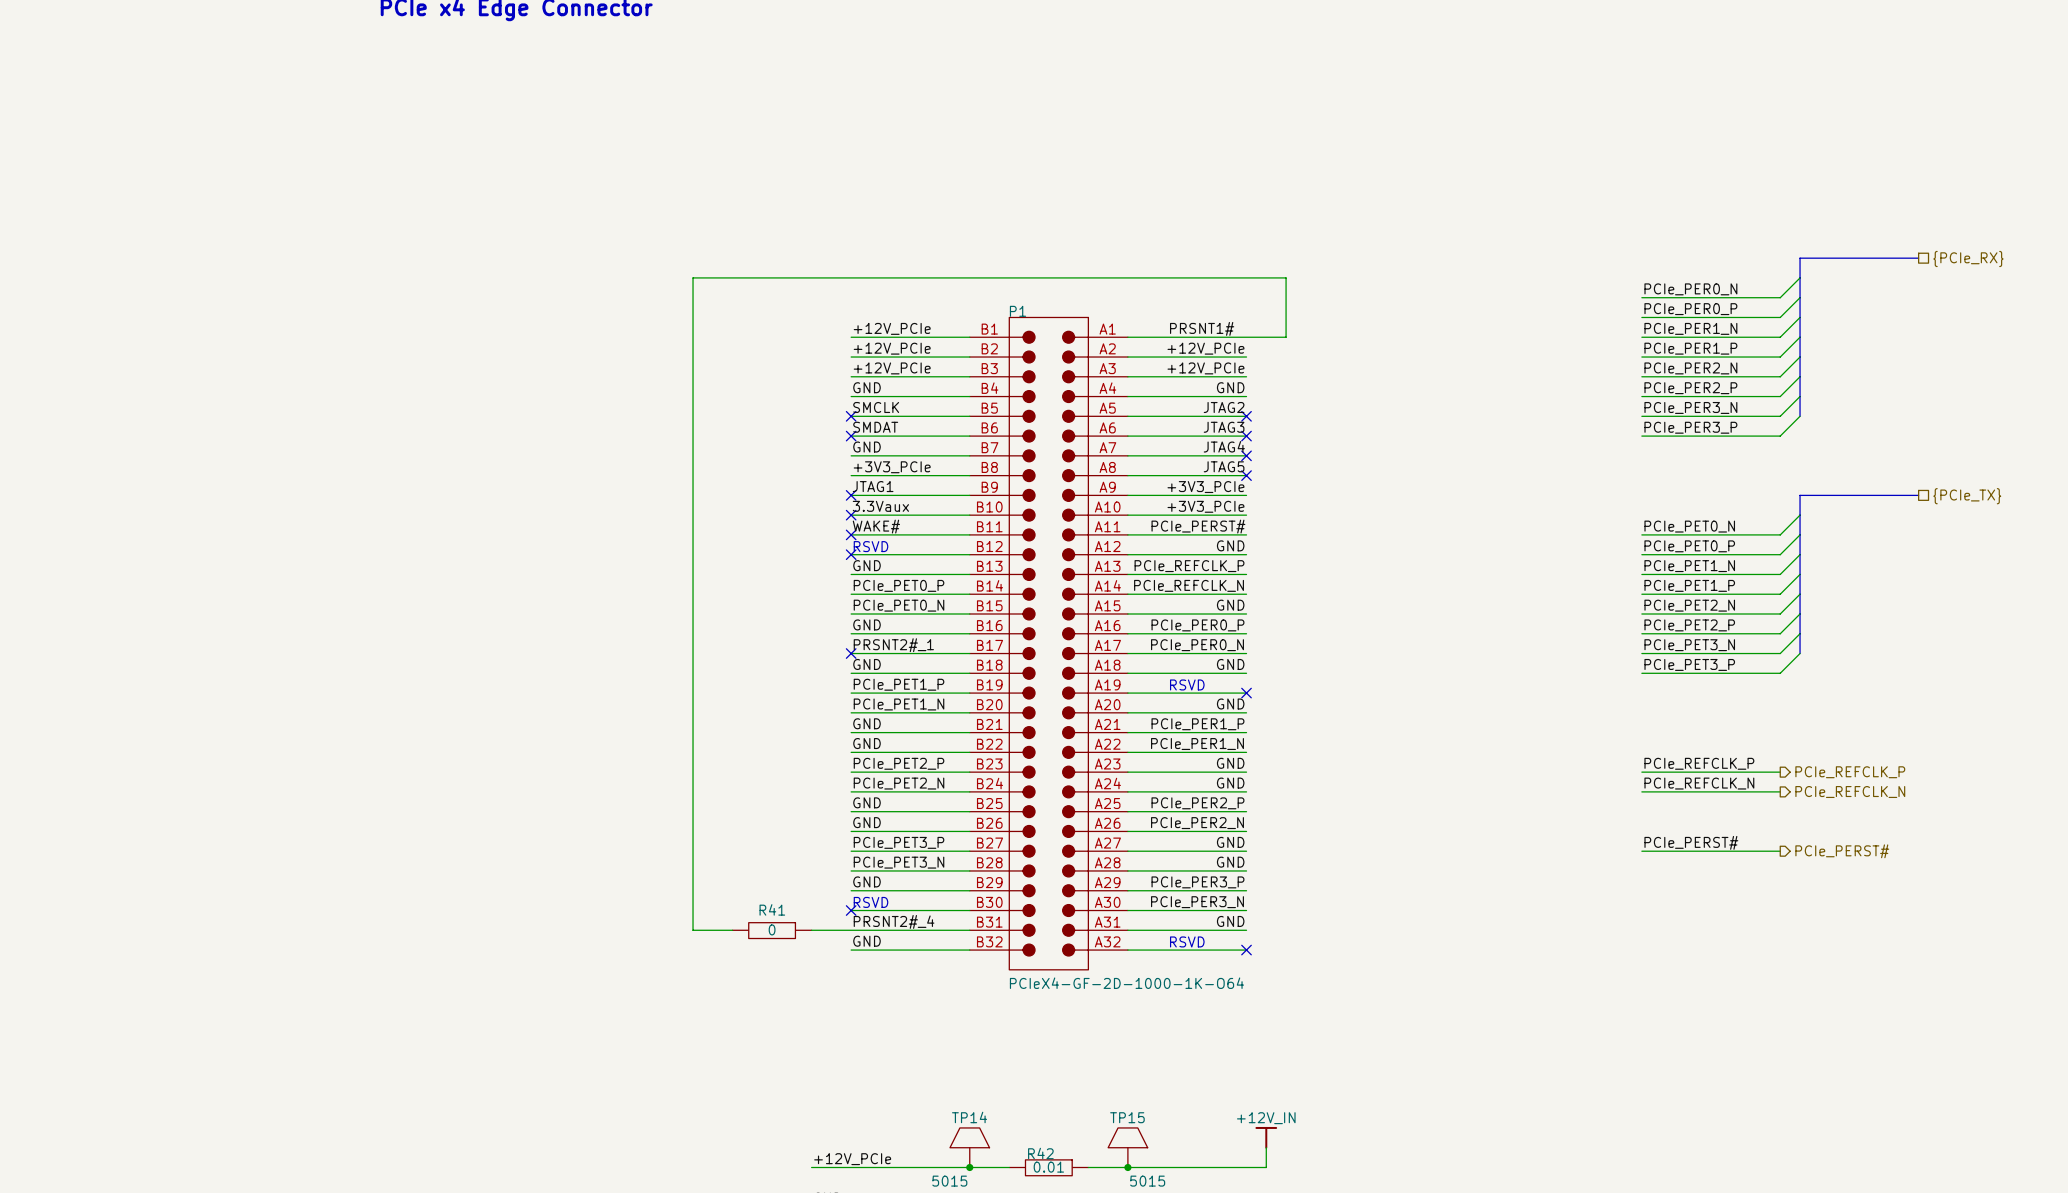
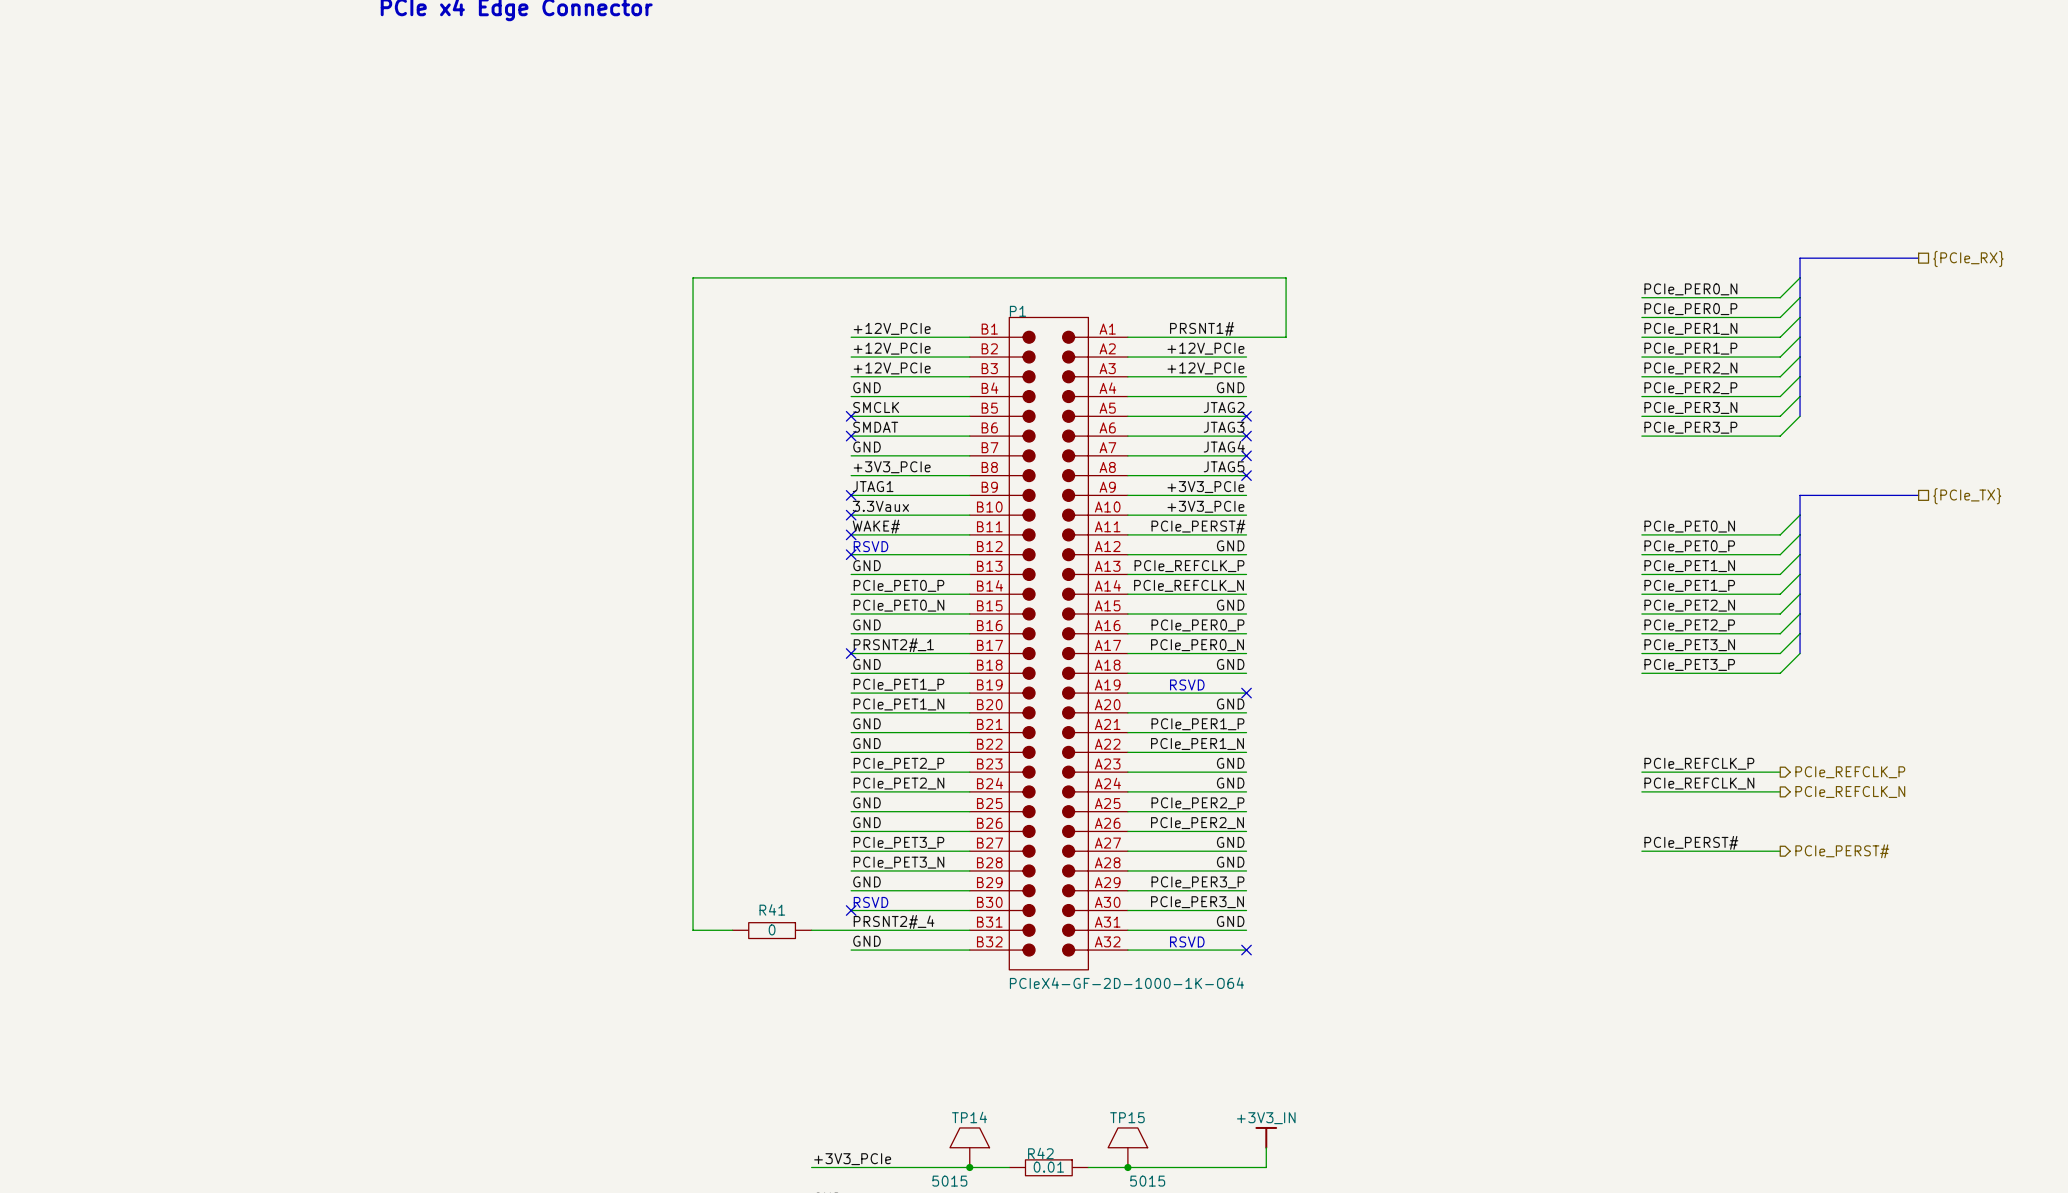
power symbol: +12V_IN (1266, 1137) -> +3V3_IN (1266, 1137)
label: +12V_PCIe (852, 1159) -> +3V3_PCIe (852, 1159)

